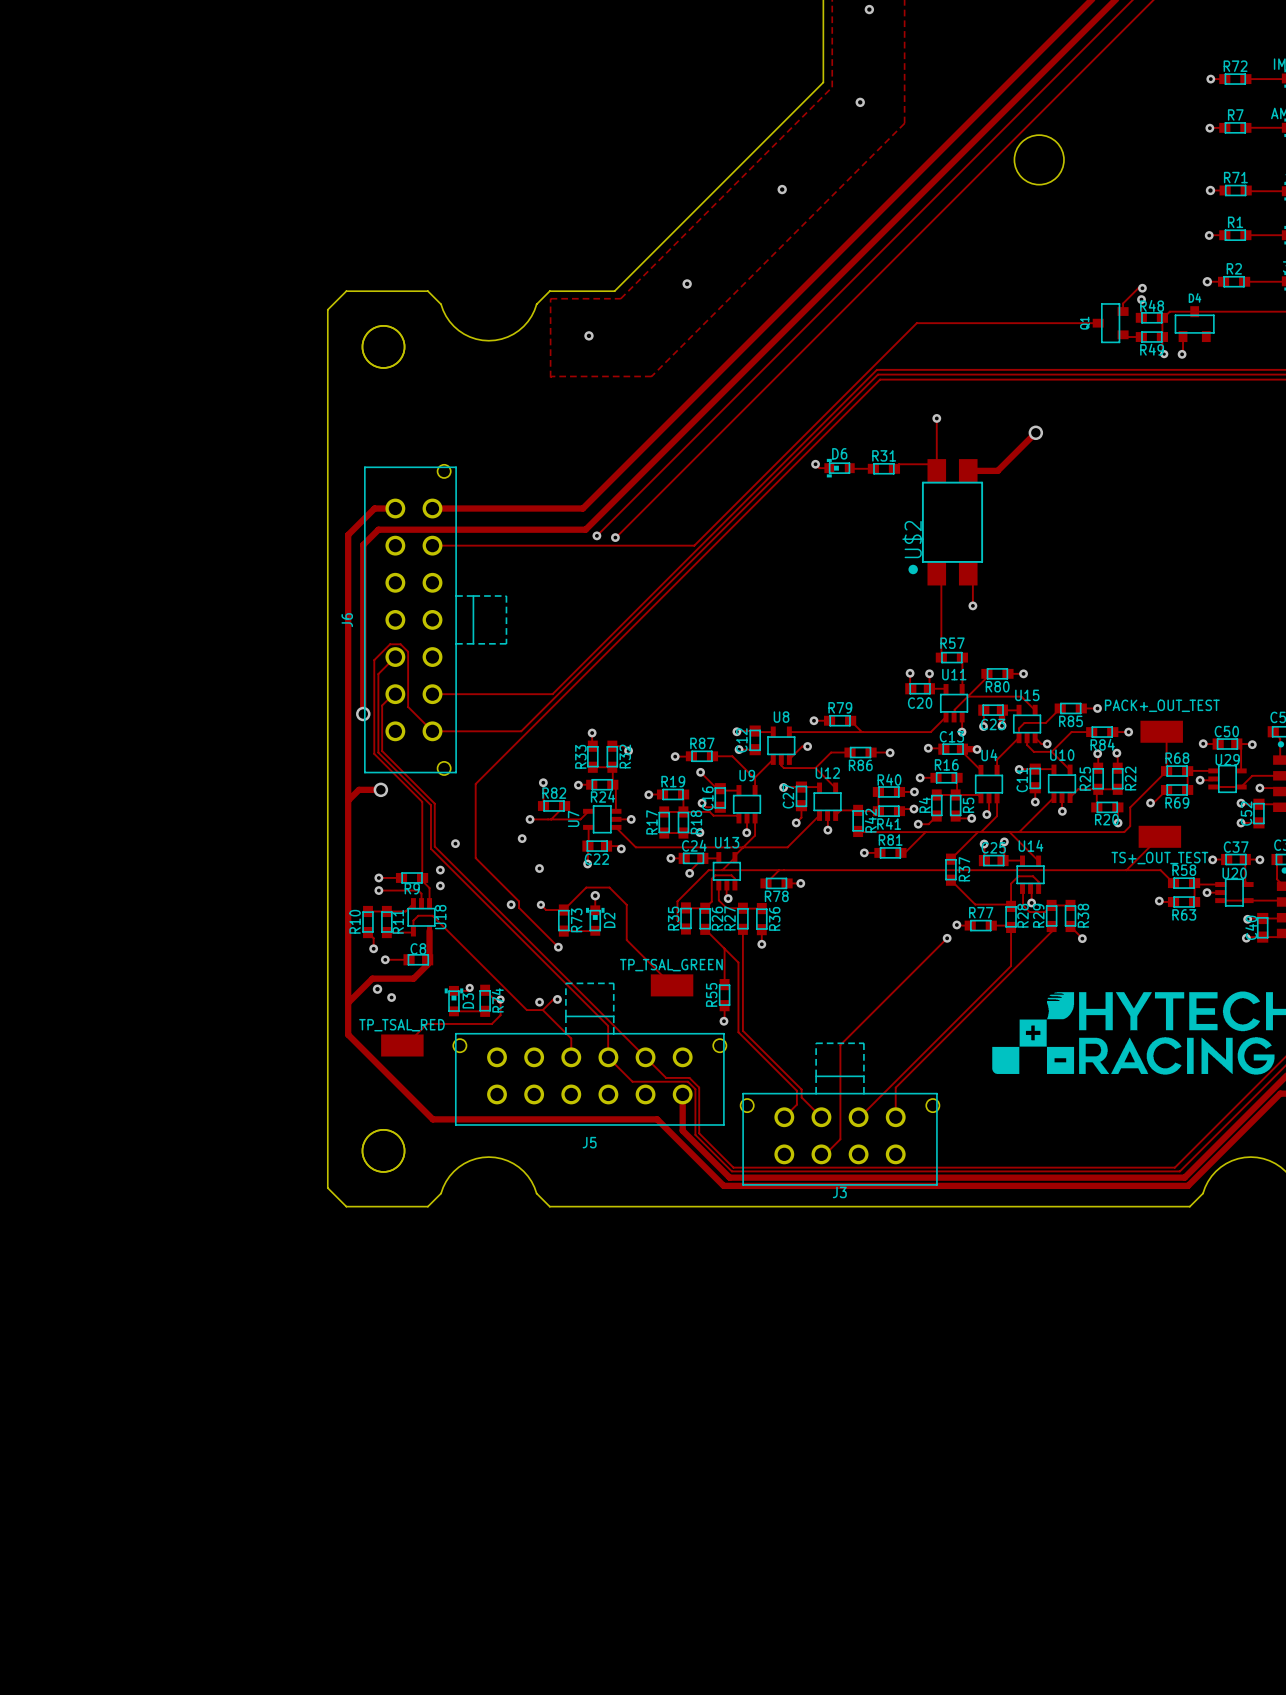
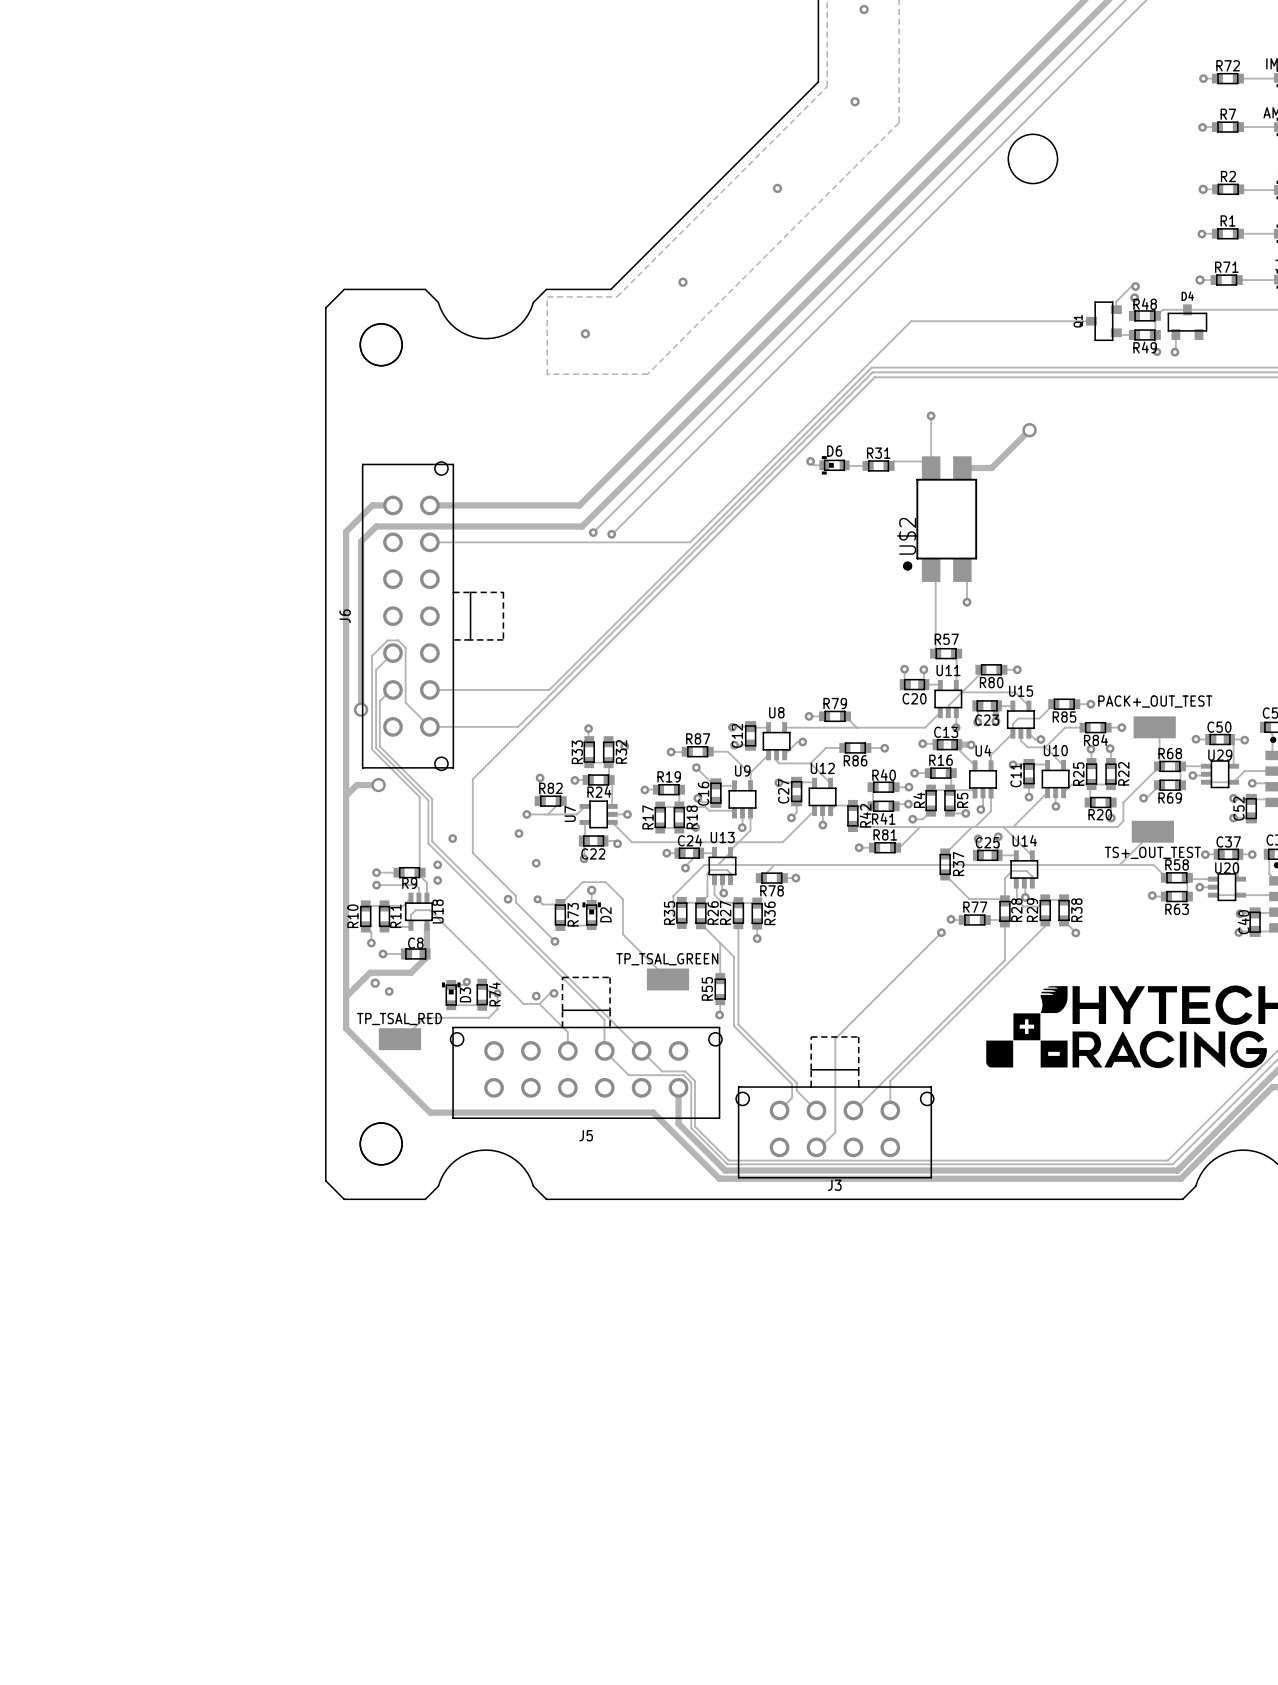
R71 name: R71 (1235, 177) -> R2 (1228, 176)
R2 name: R2 (1234, 268) -> R71 (1226, 267)

